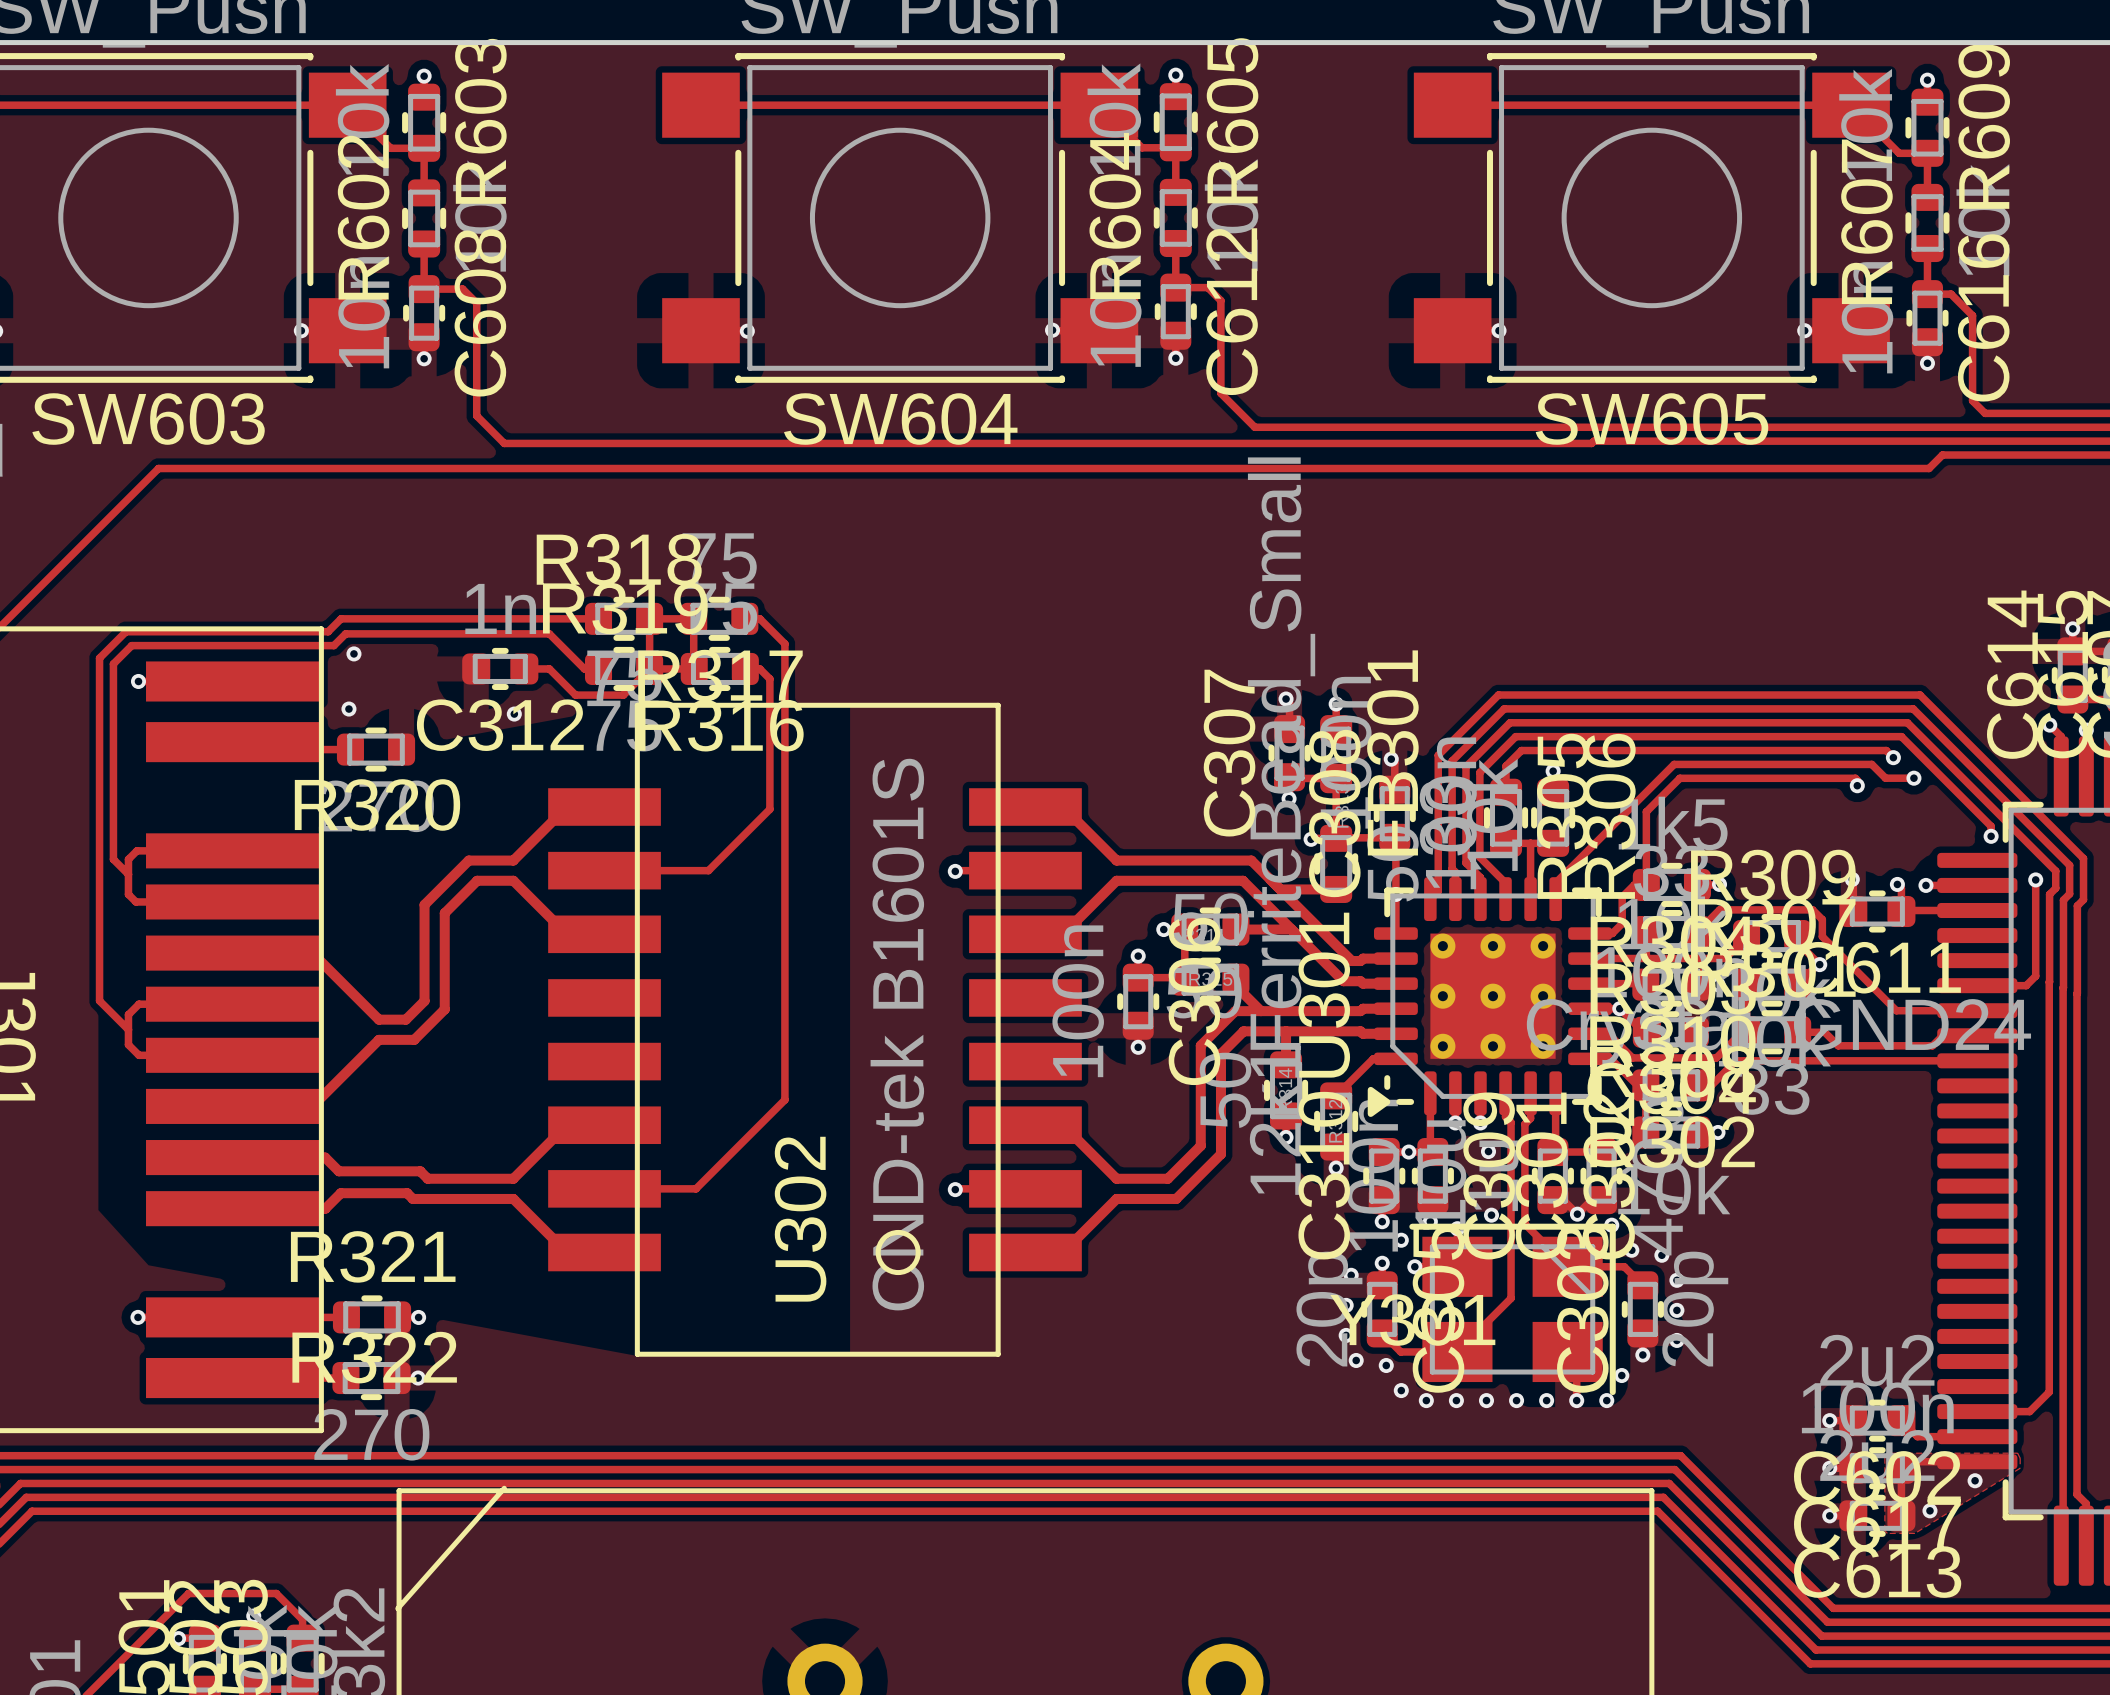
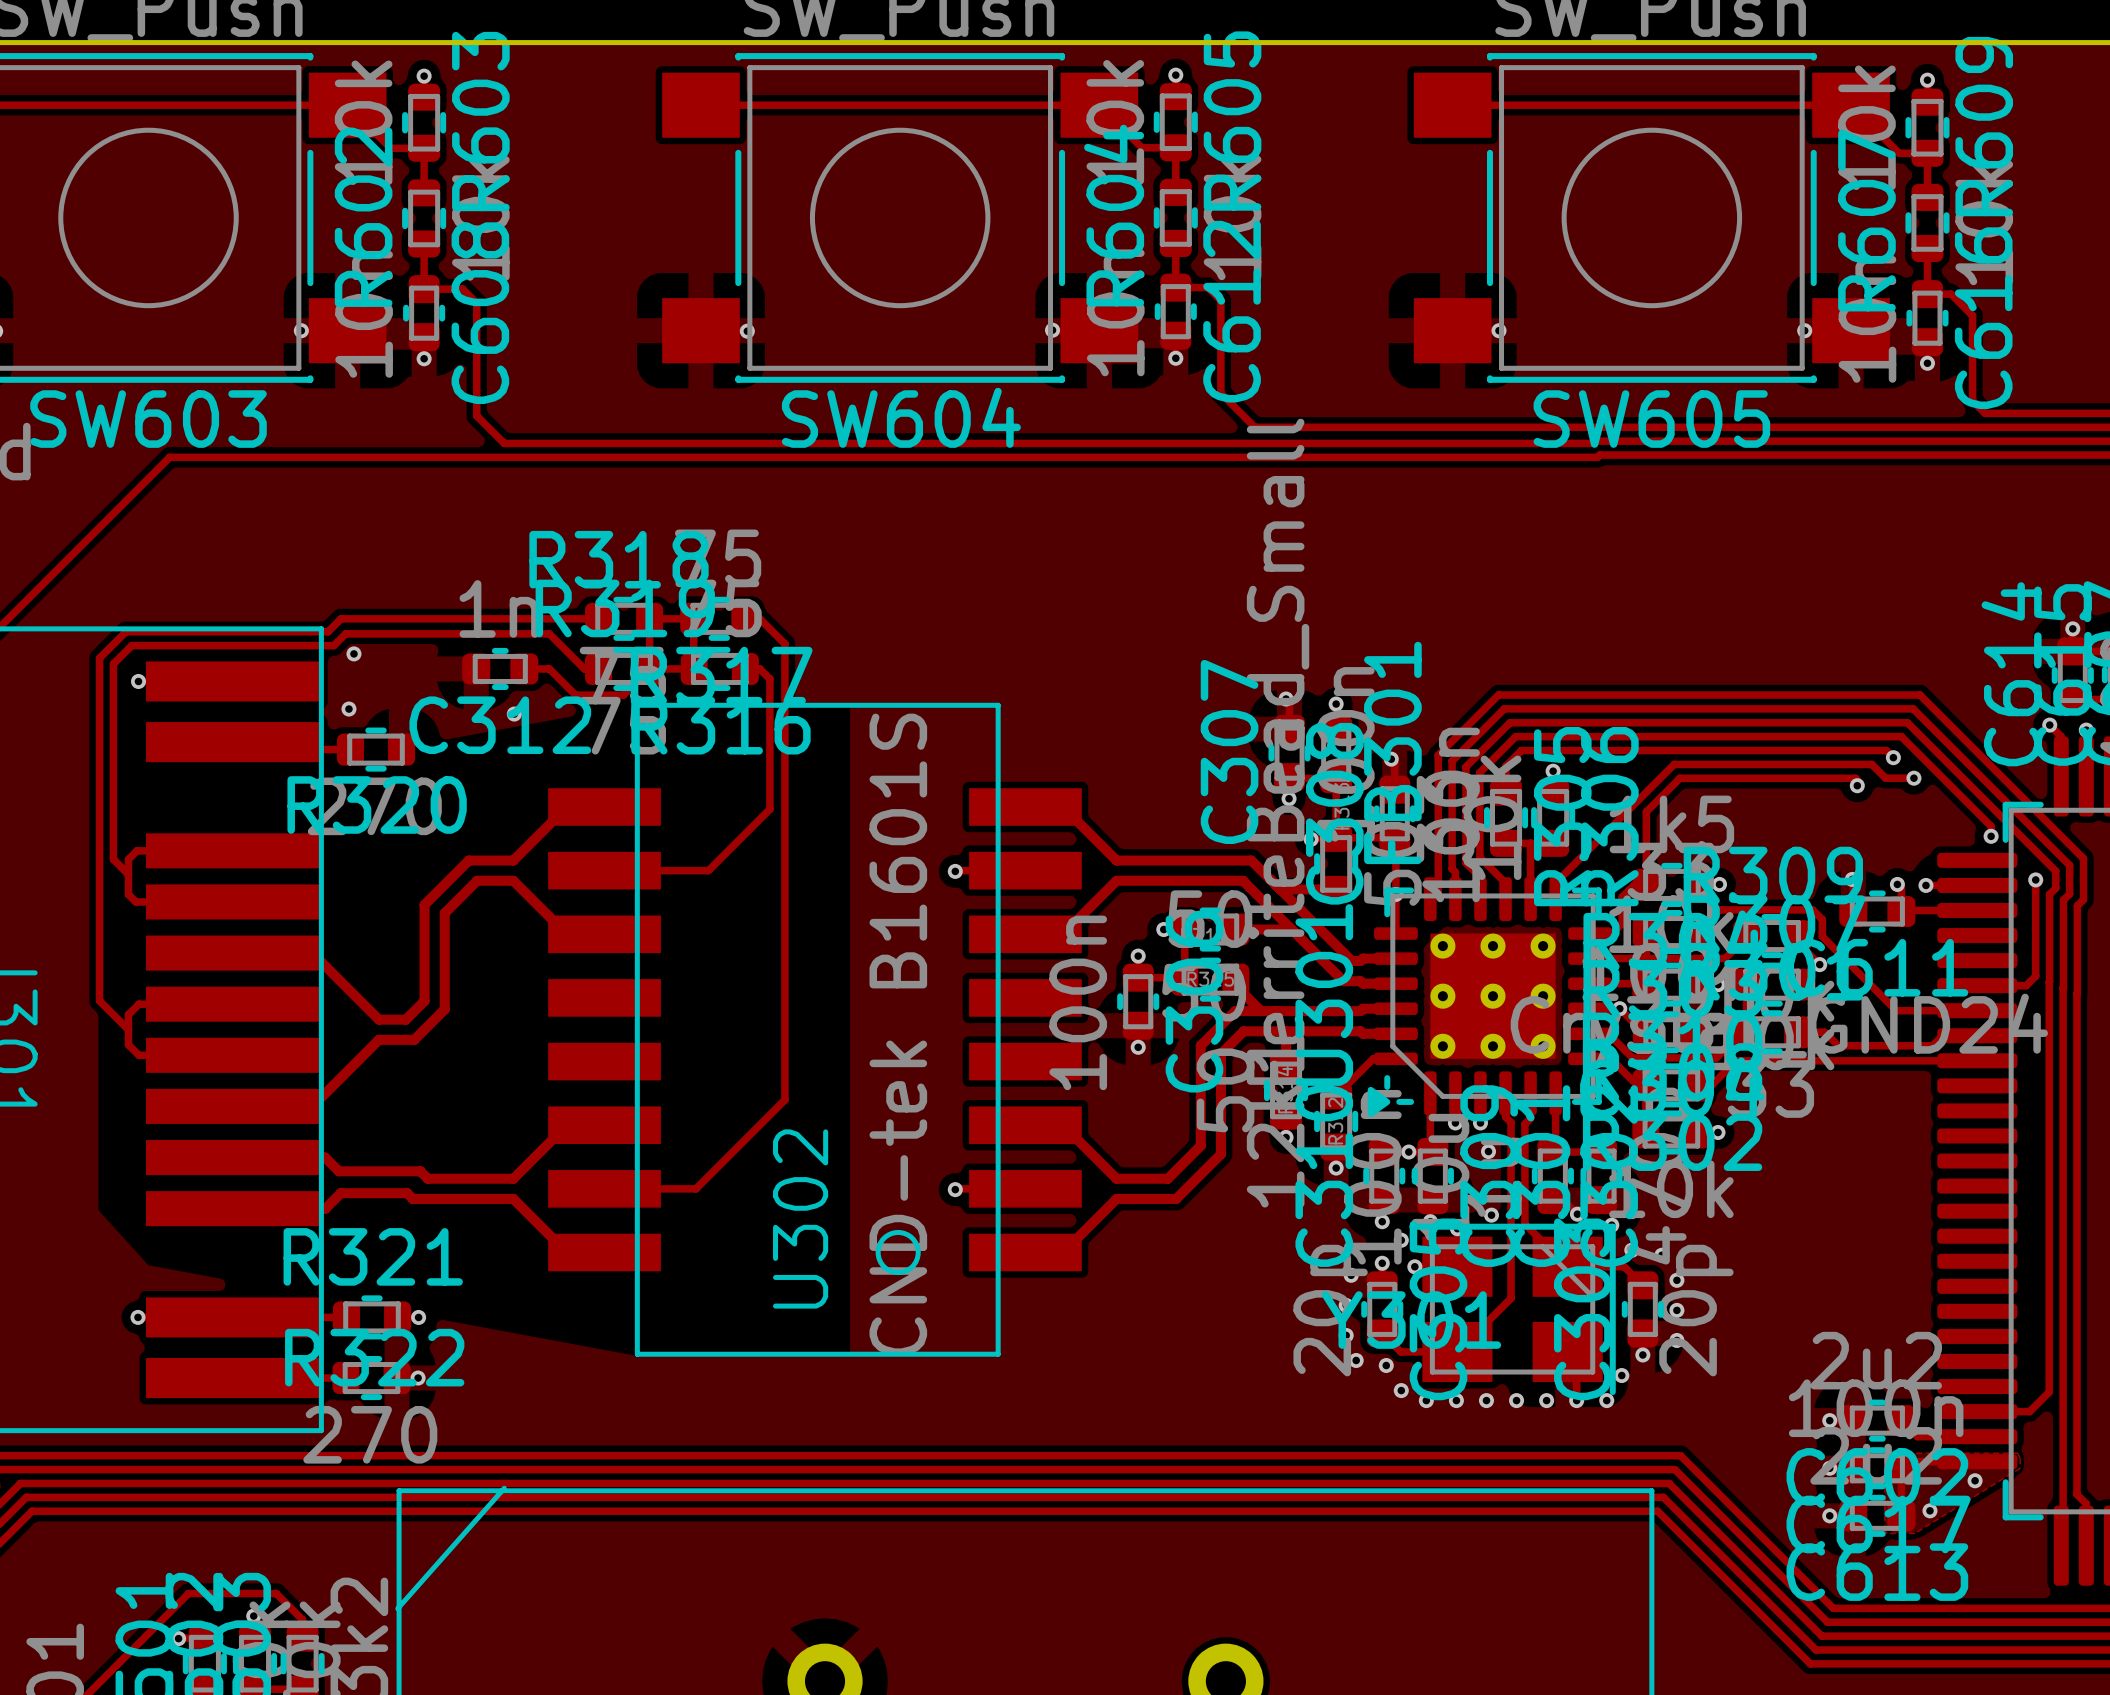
track: (1942, 455) (1929, 468) (158, 468) -> (1942, 455) (1599, 455) (1597, 457) (169, 457) (158, 468)

